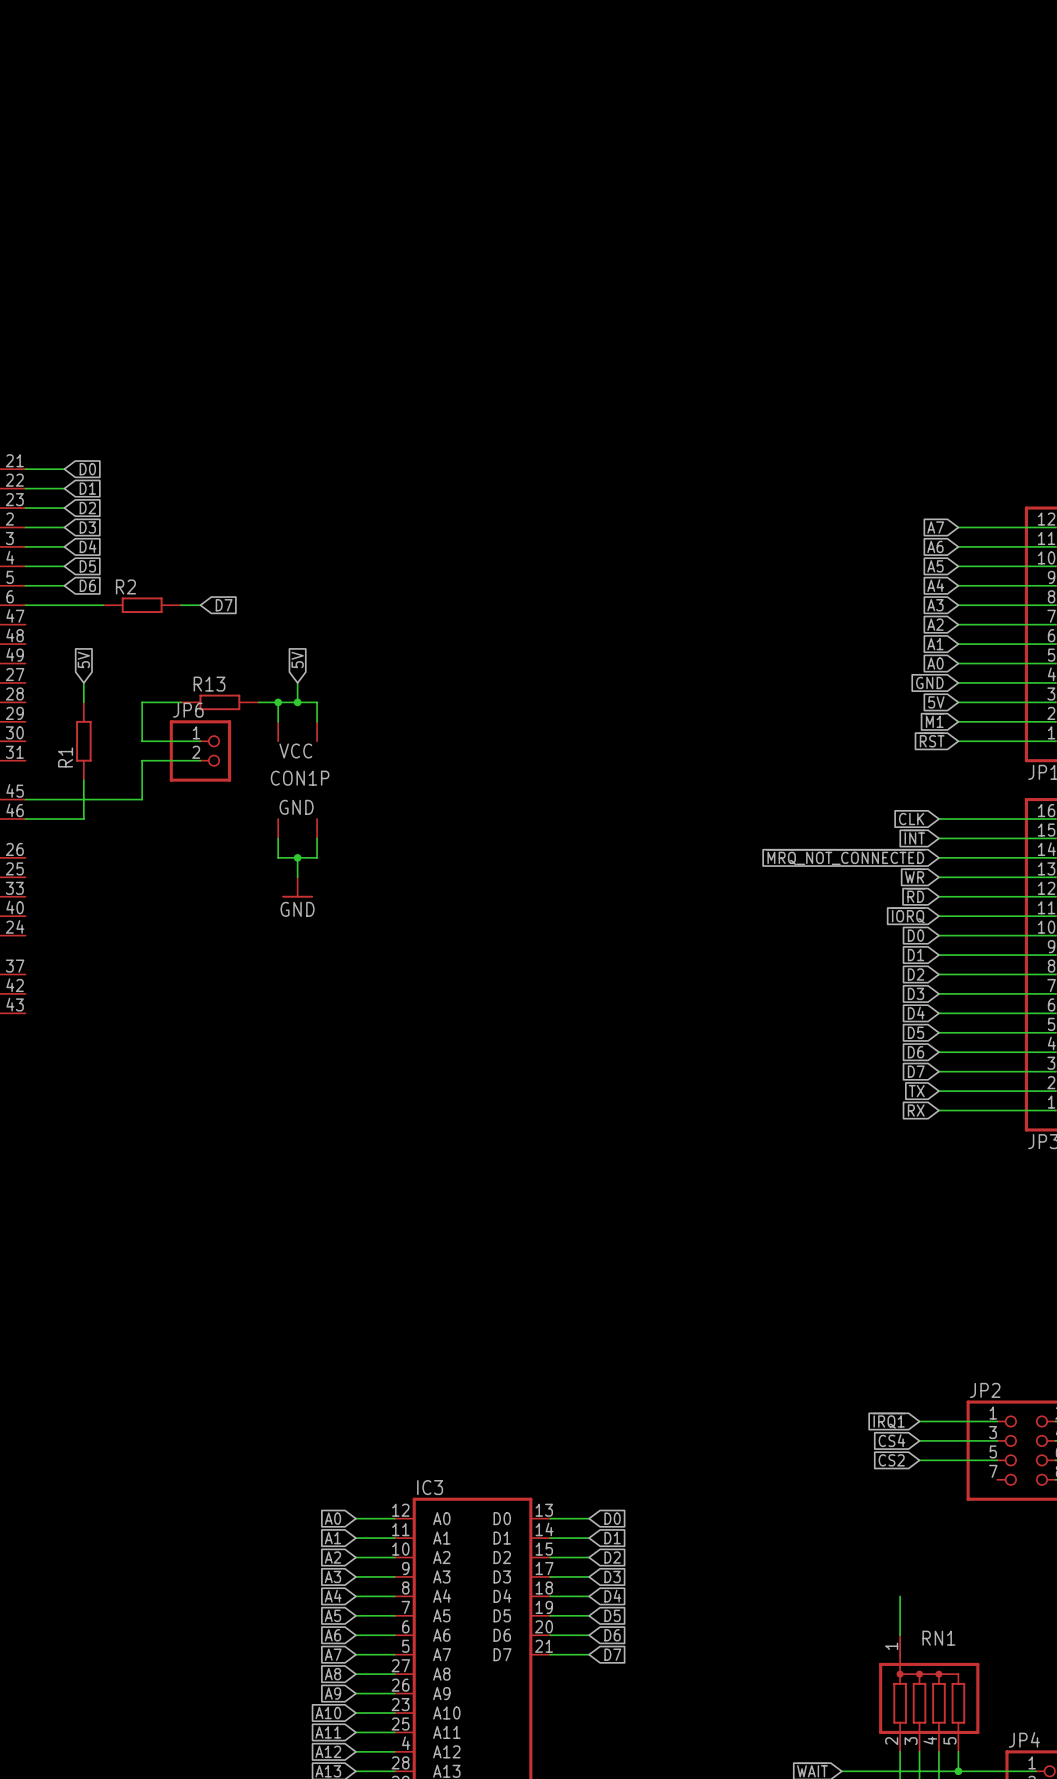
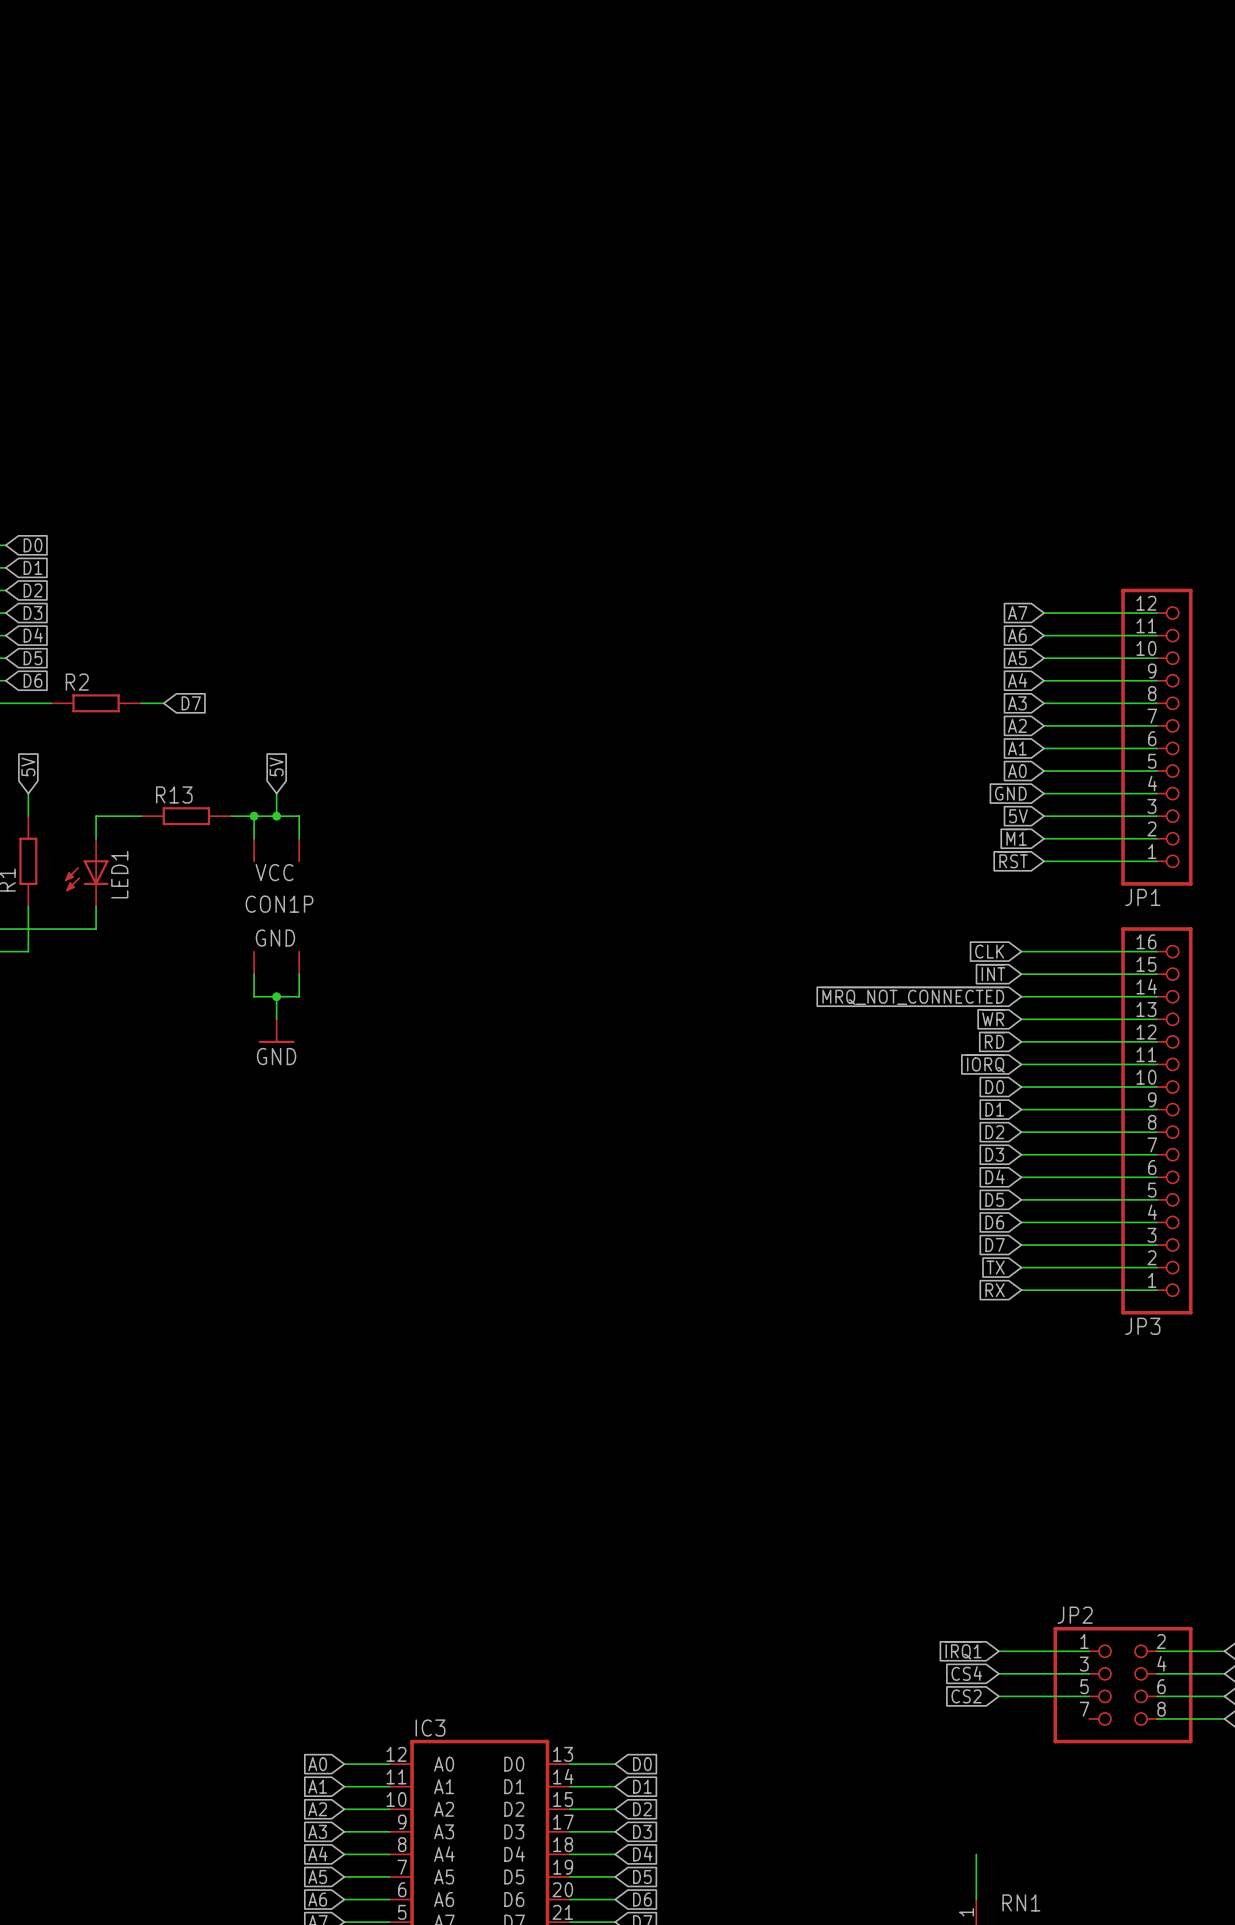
wire: (142, 721) (142, 741) (200, 741) -> none
LED1: none -> (86, 872)
JP6: (200, 750) -> none
wire: (200, 760) (142, 760) (142, 780) -> none

